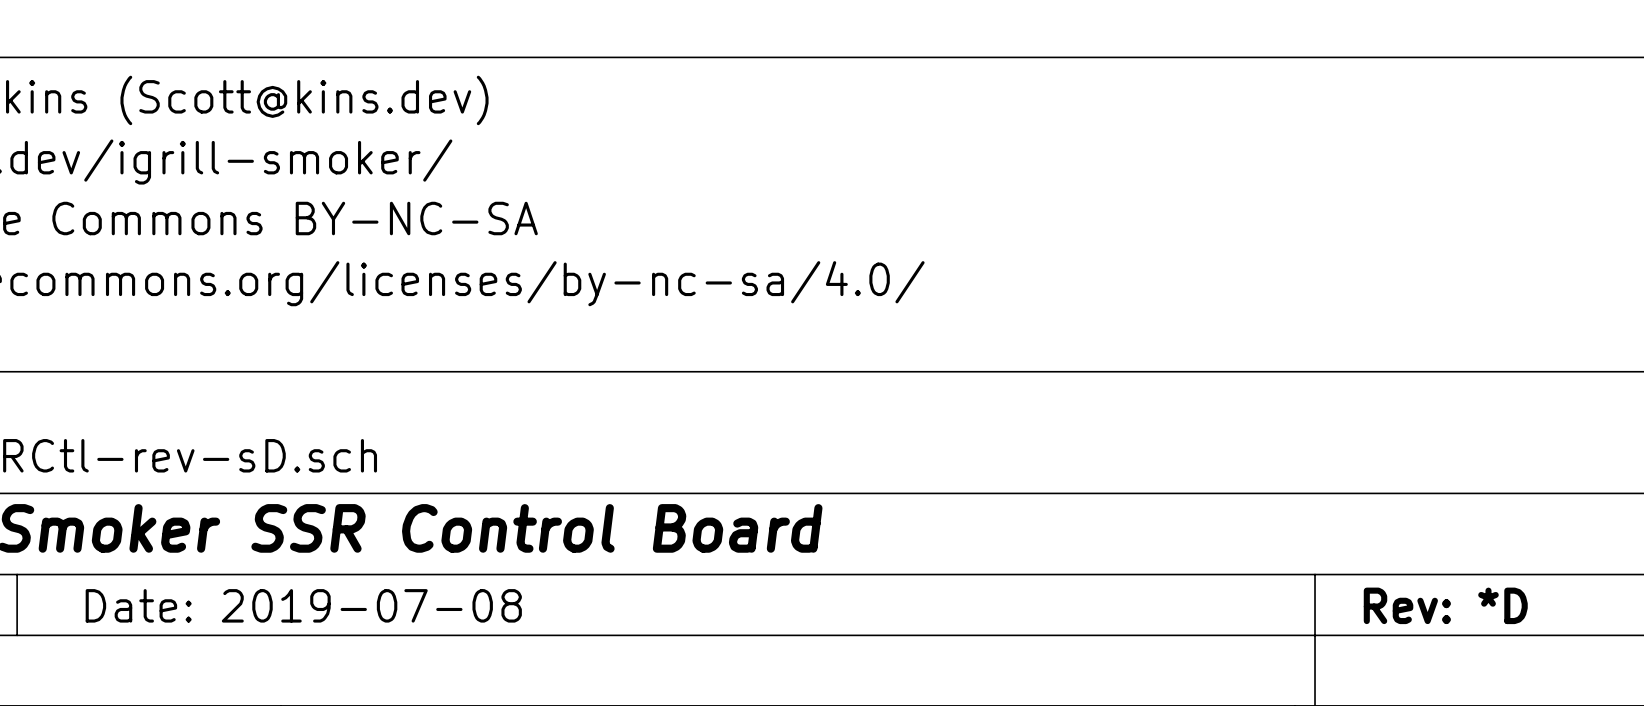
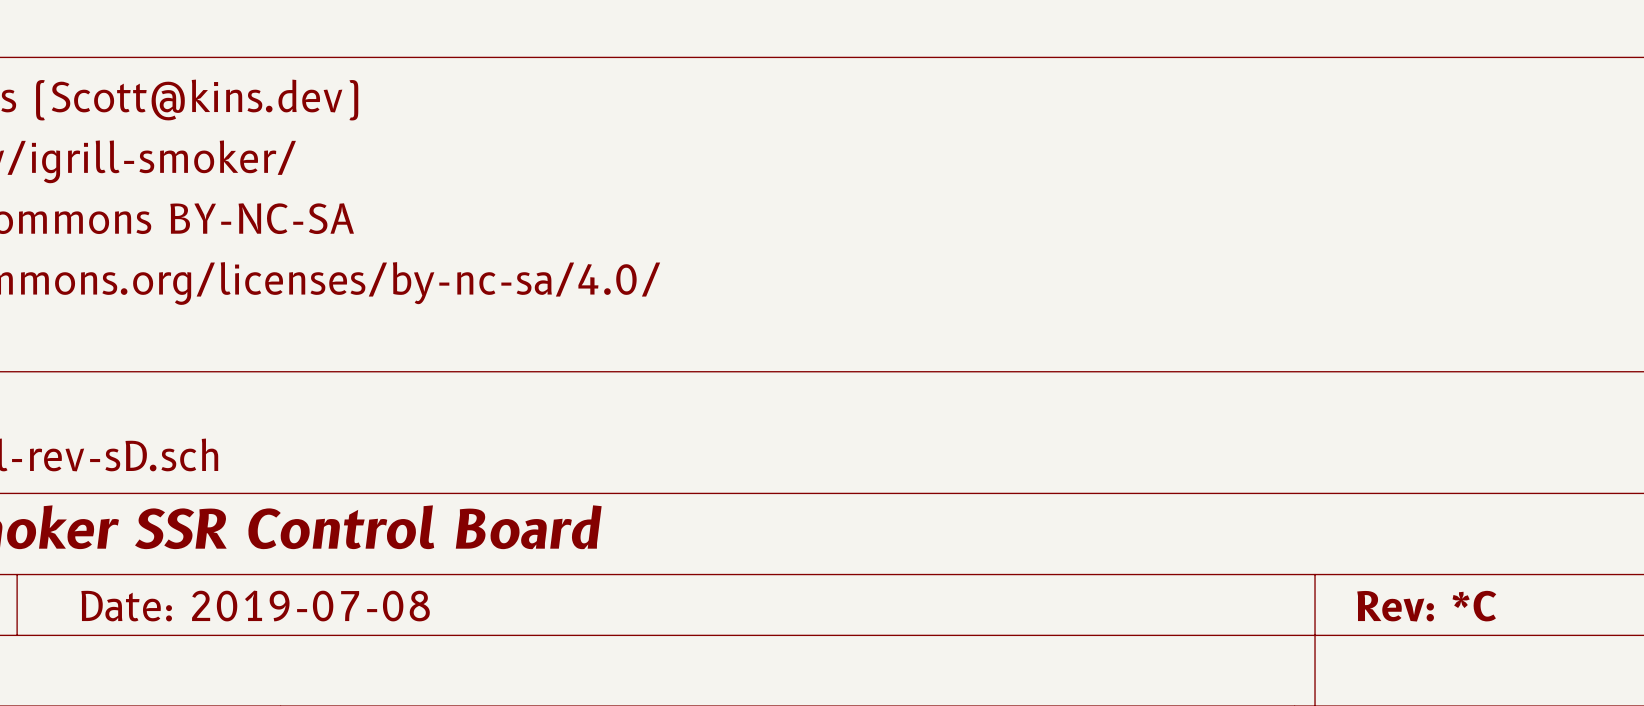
title block: Rev: *D (1445, 605) -> Rev: *C (1426, 606)

